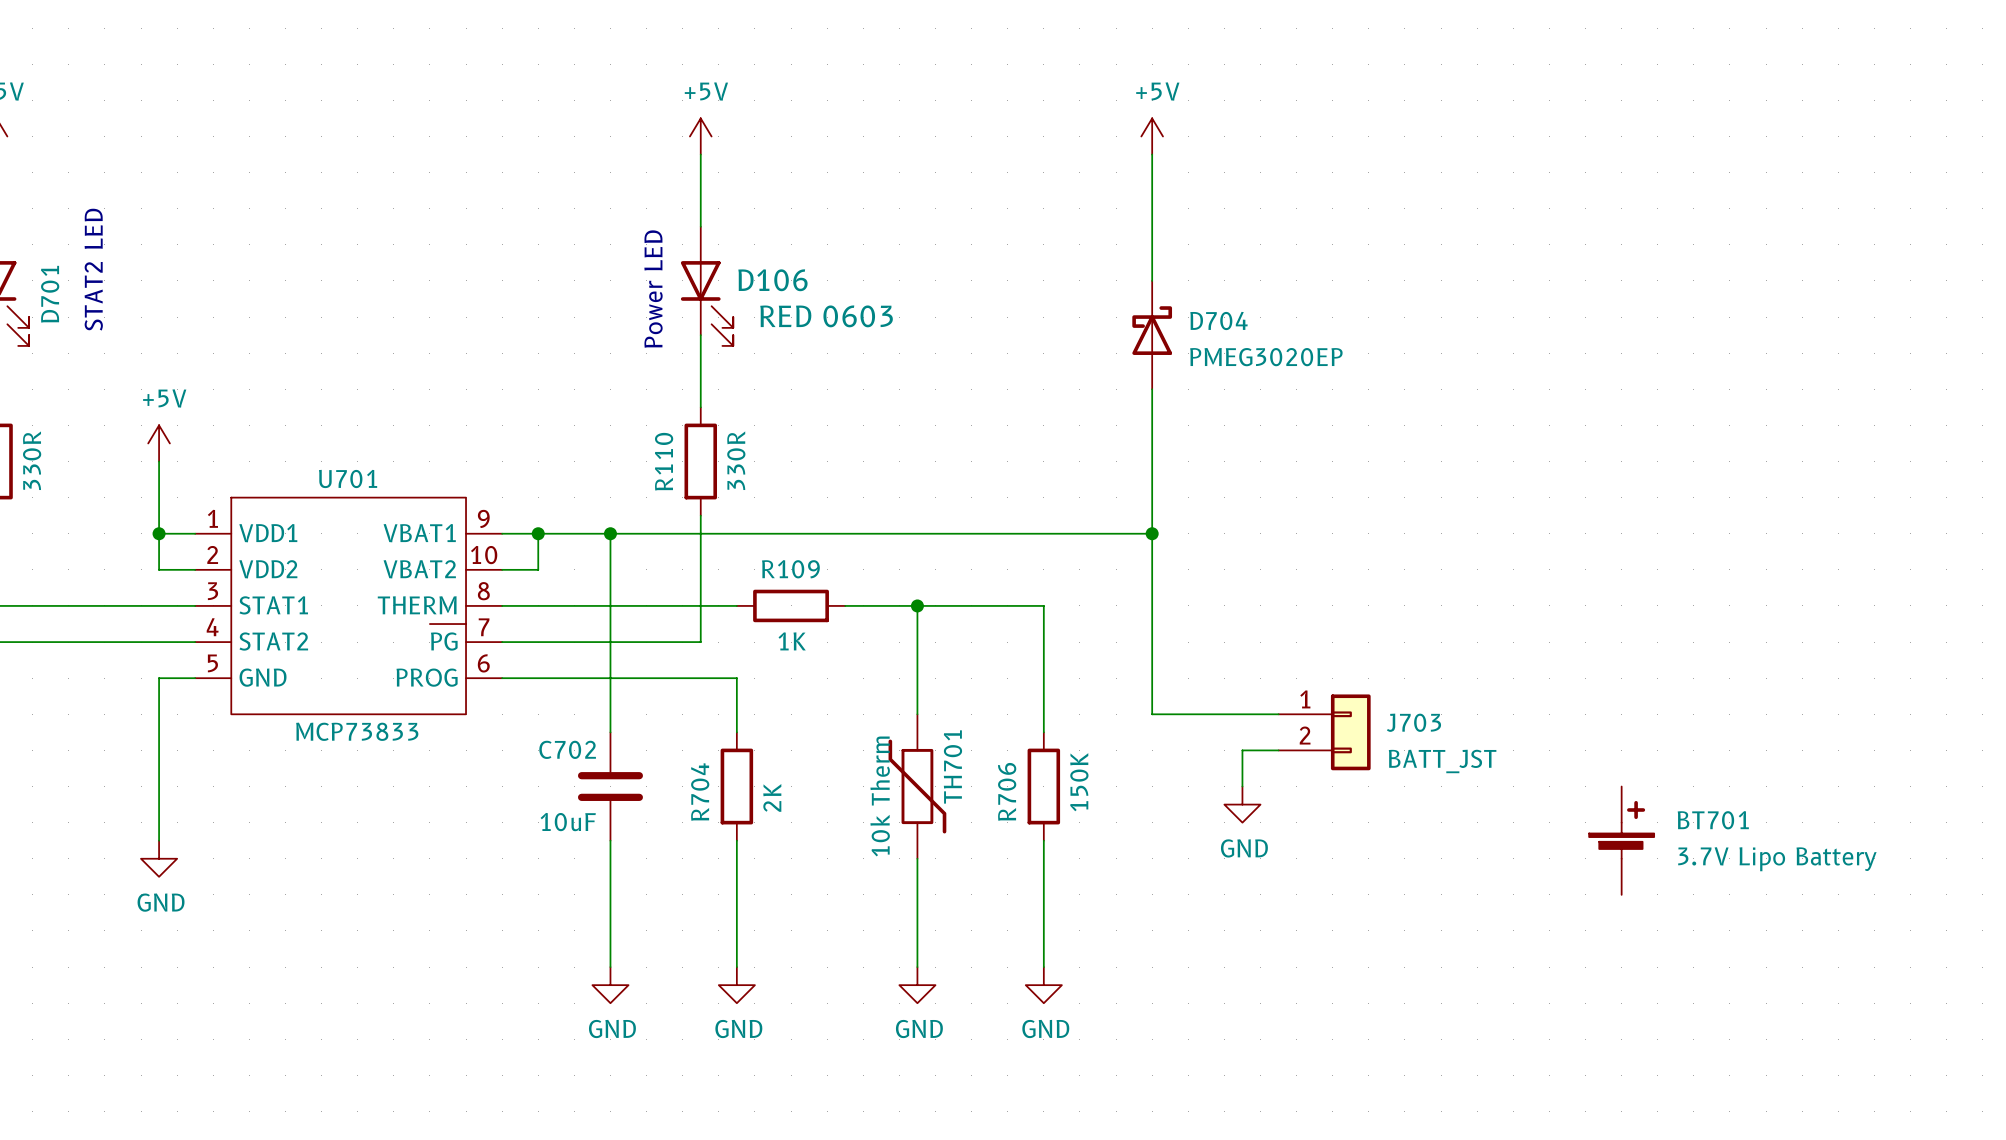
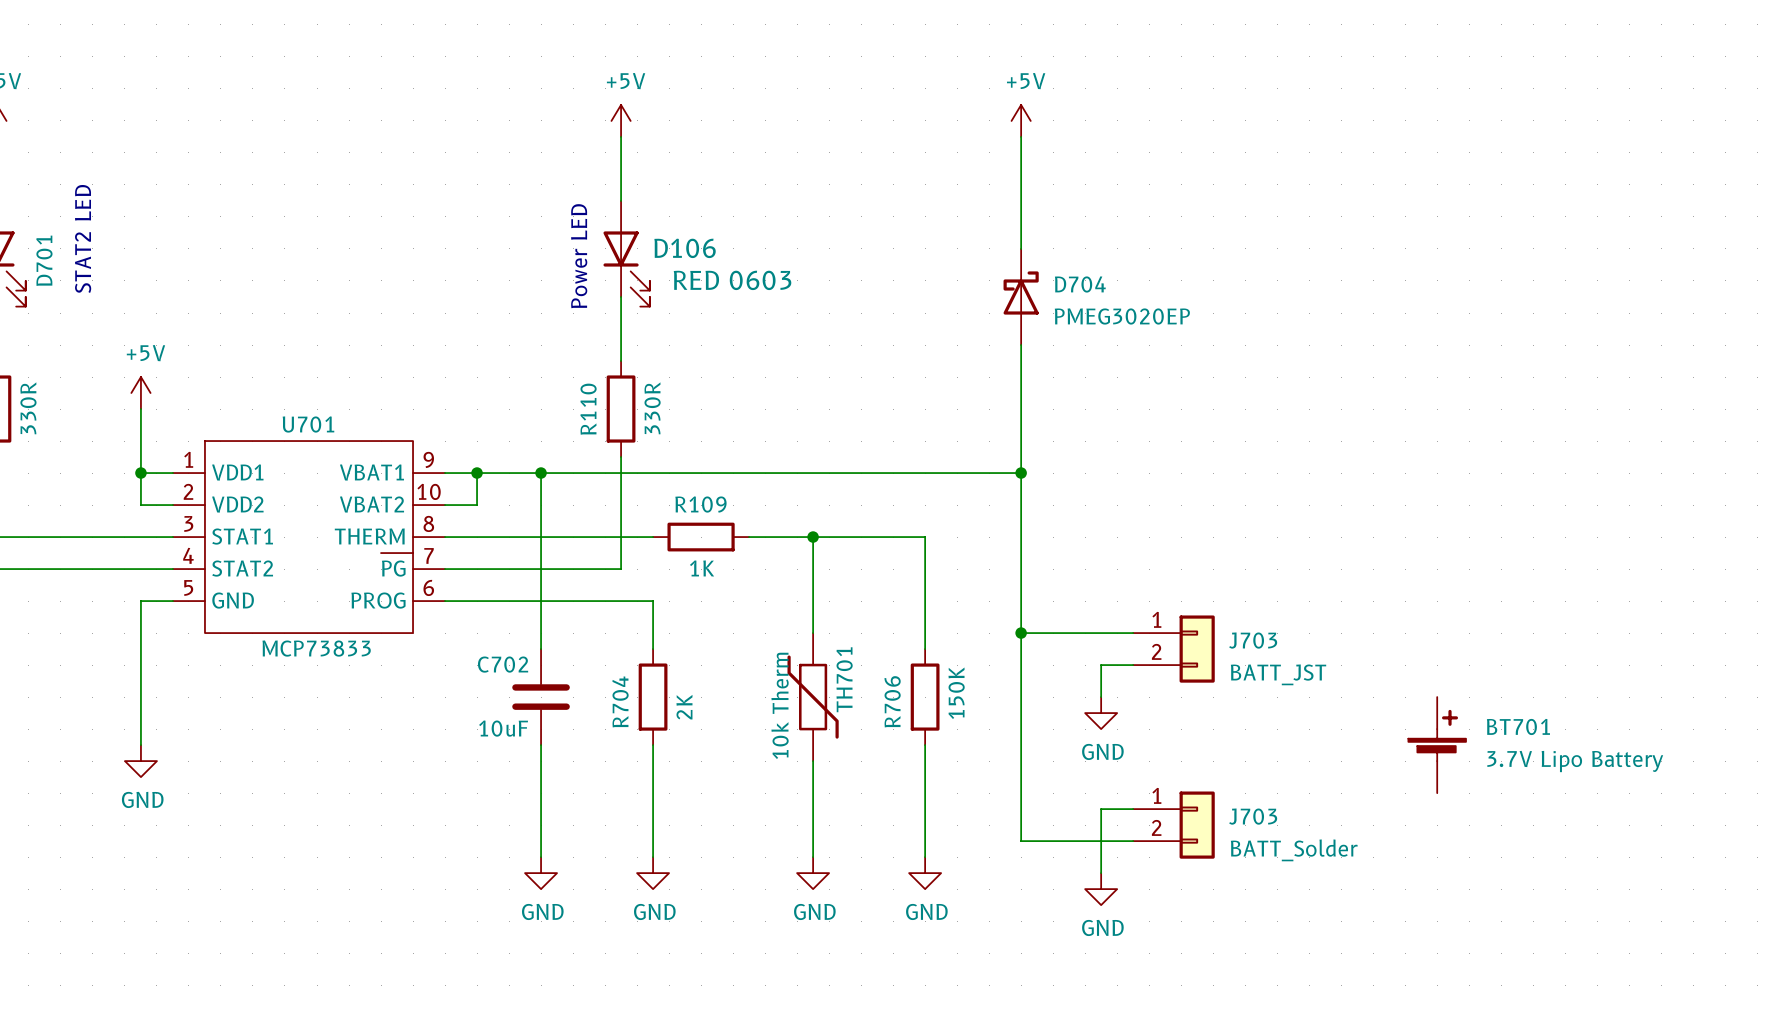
wire: none -> (1021, 633) (1021, 841) (1133, 841)
junction: none -> (1021, 633)
wire: none -> (1133, 809) (1101, 809) (1101, 873)
J703: none -> BATT_Solder (1173, 825)
power symbol: none -> GND (1101, 889)

